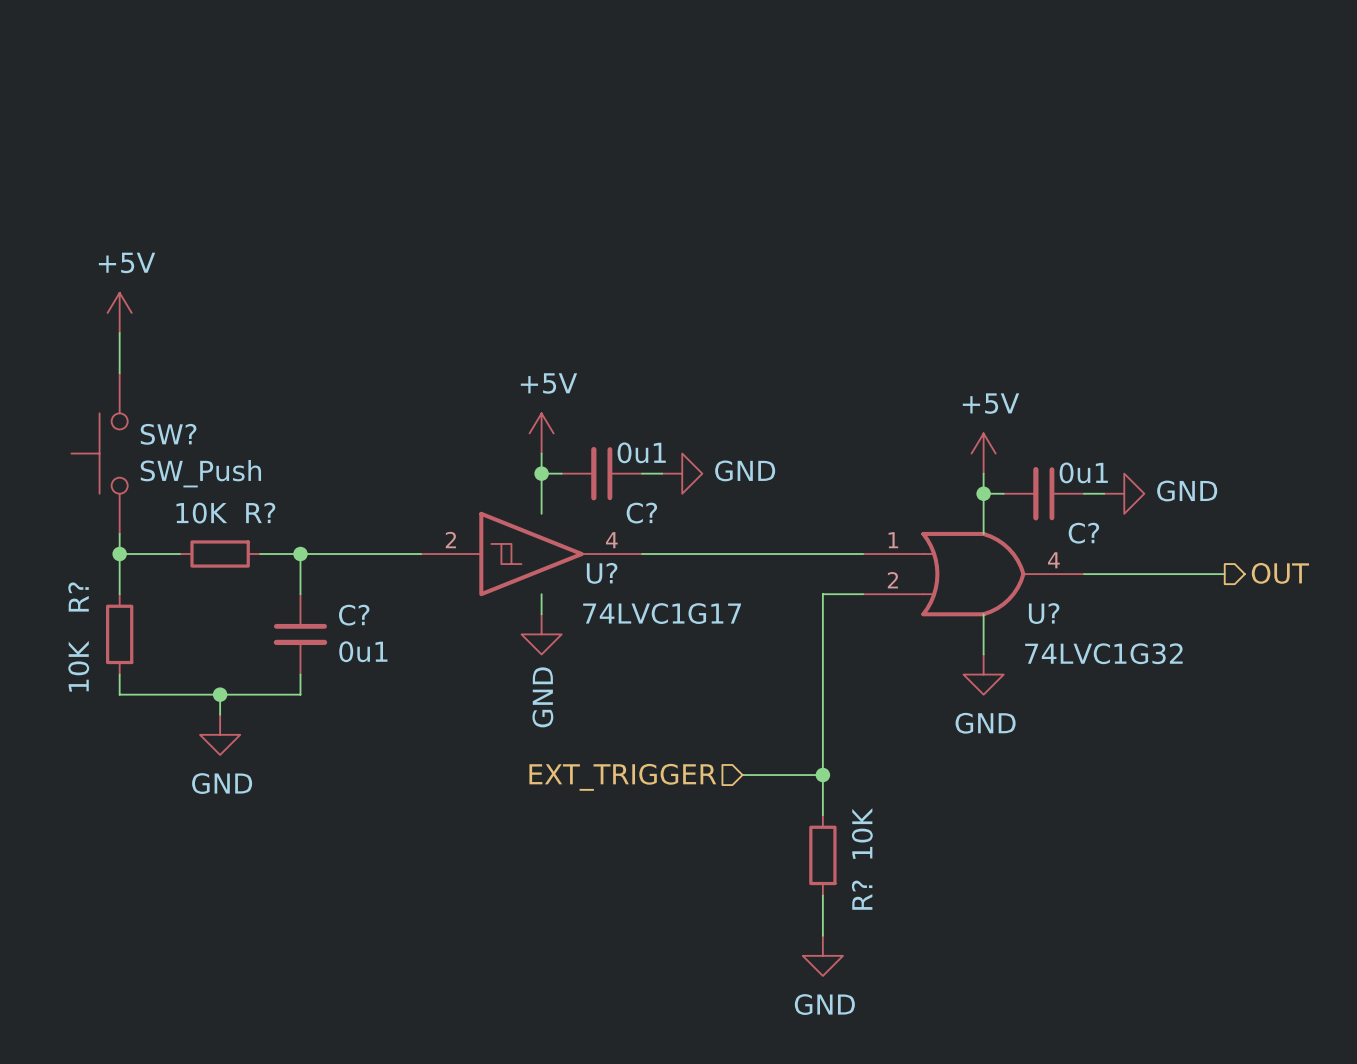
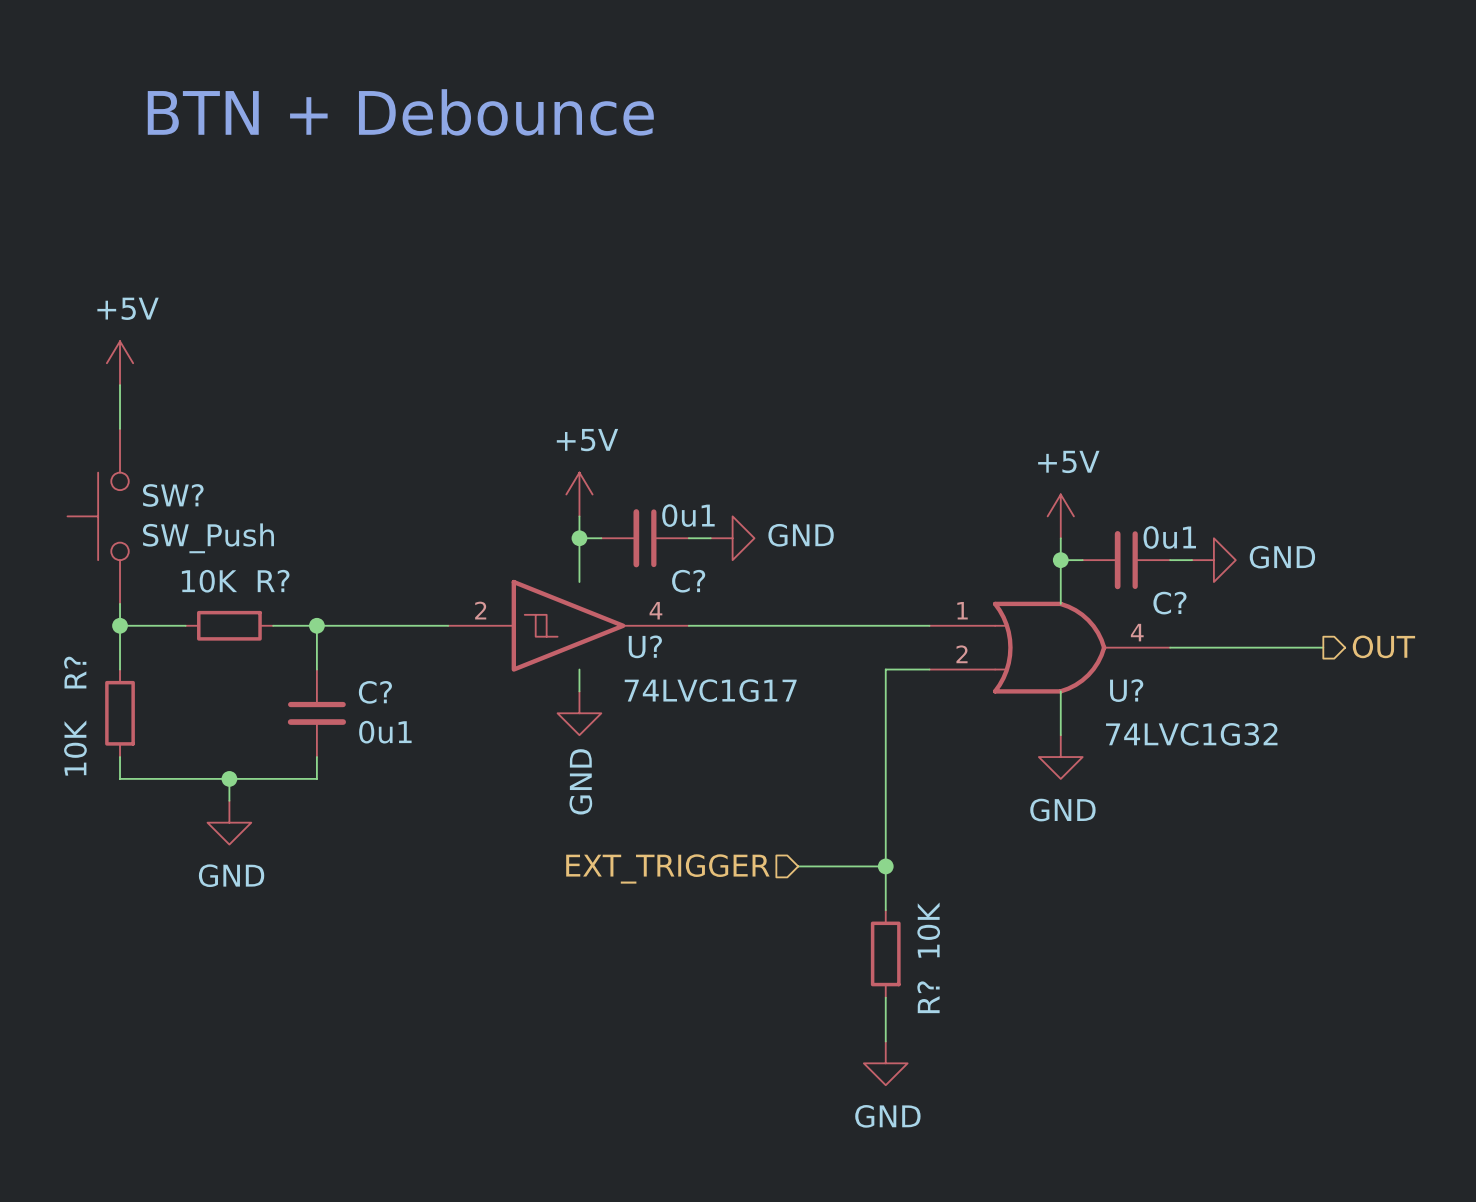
text: none -> BTN + Debounce (400, 112)

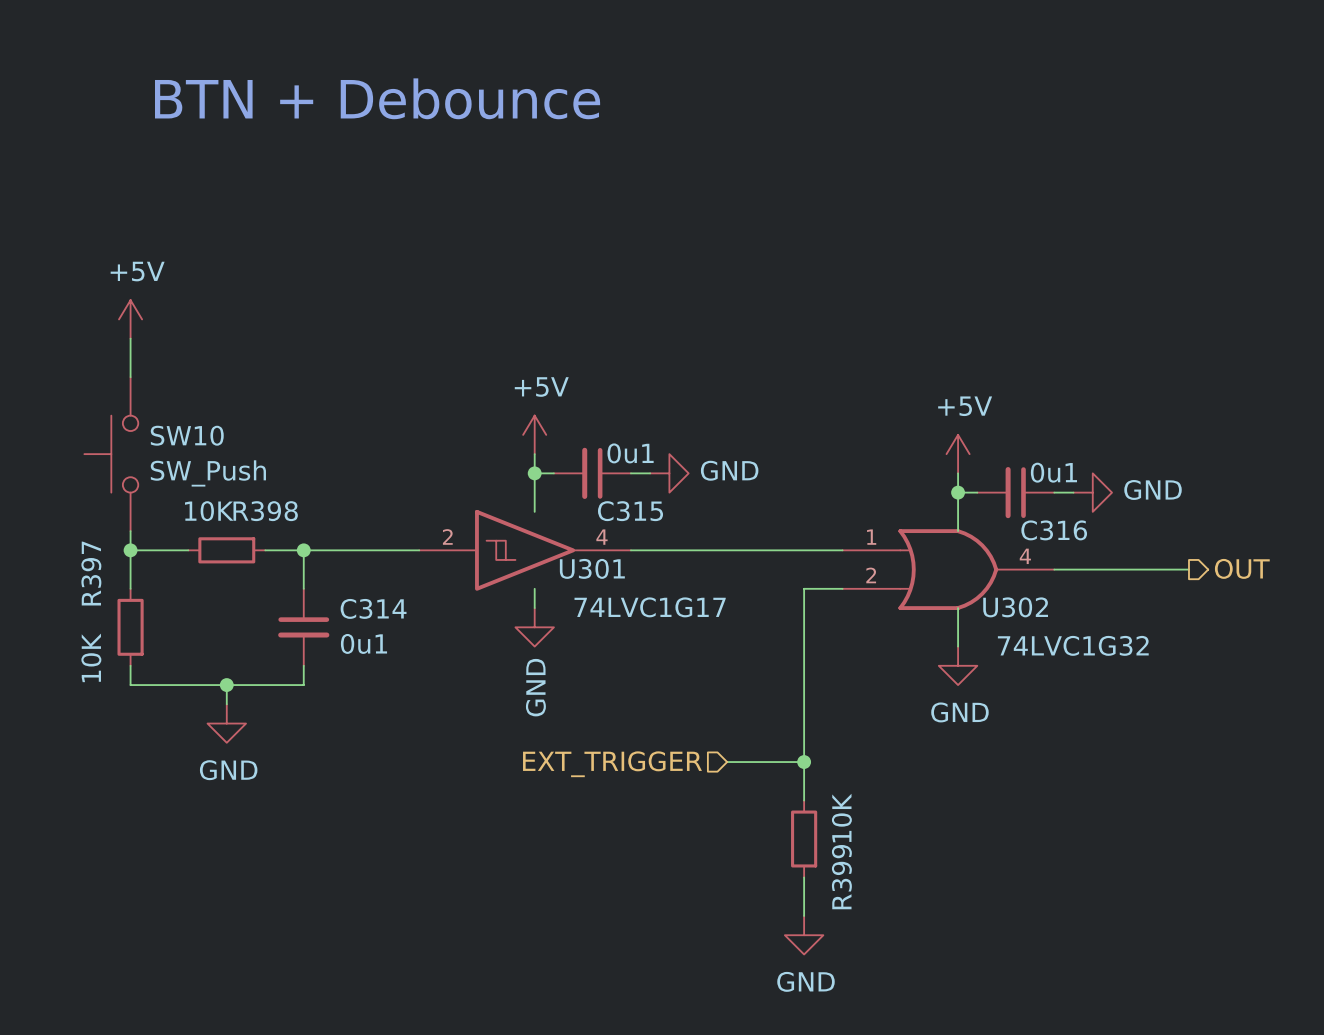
SW? name: SW? (173, 495) -> SW10 (187, 435)
R? name: R? (273, 581) -> R398 (265, 511)
C? name: C? (688, 581) -> C315 (630, 511)
C? name: C? (1169, 603) -> C316 (1054, 530)
U? name: U? (645, 646) -> U301 (592, 568)
R? name: R? (75, 672) -> R397 (91, 573)
U? name: U? (1126, 690) -> U302 (1015, 607)
C? name: C? (375, 692) -> C314 (373, 608)
R? name: R? (928, 997) -> R399 (841, 877)

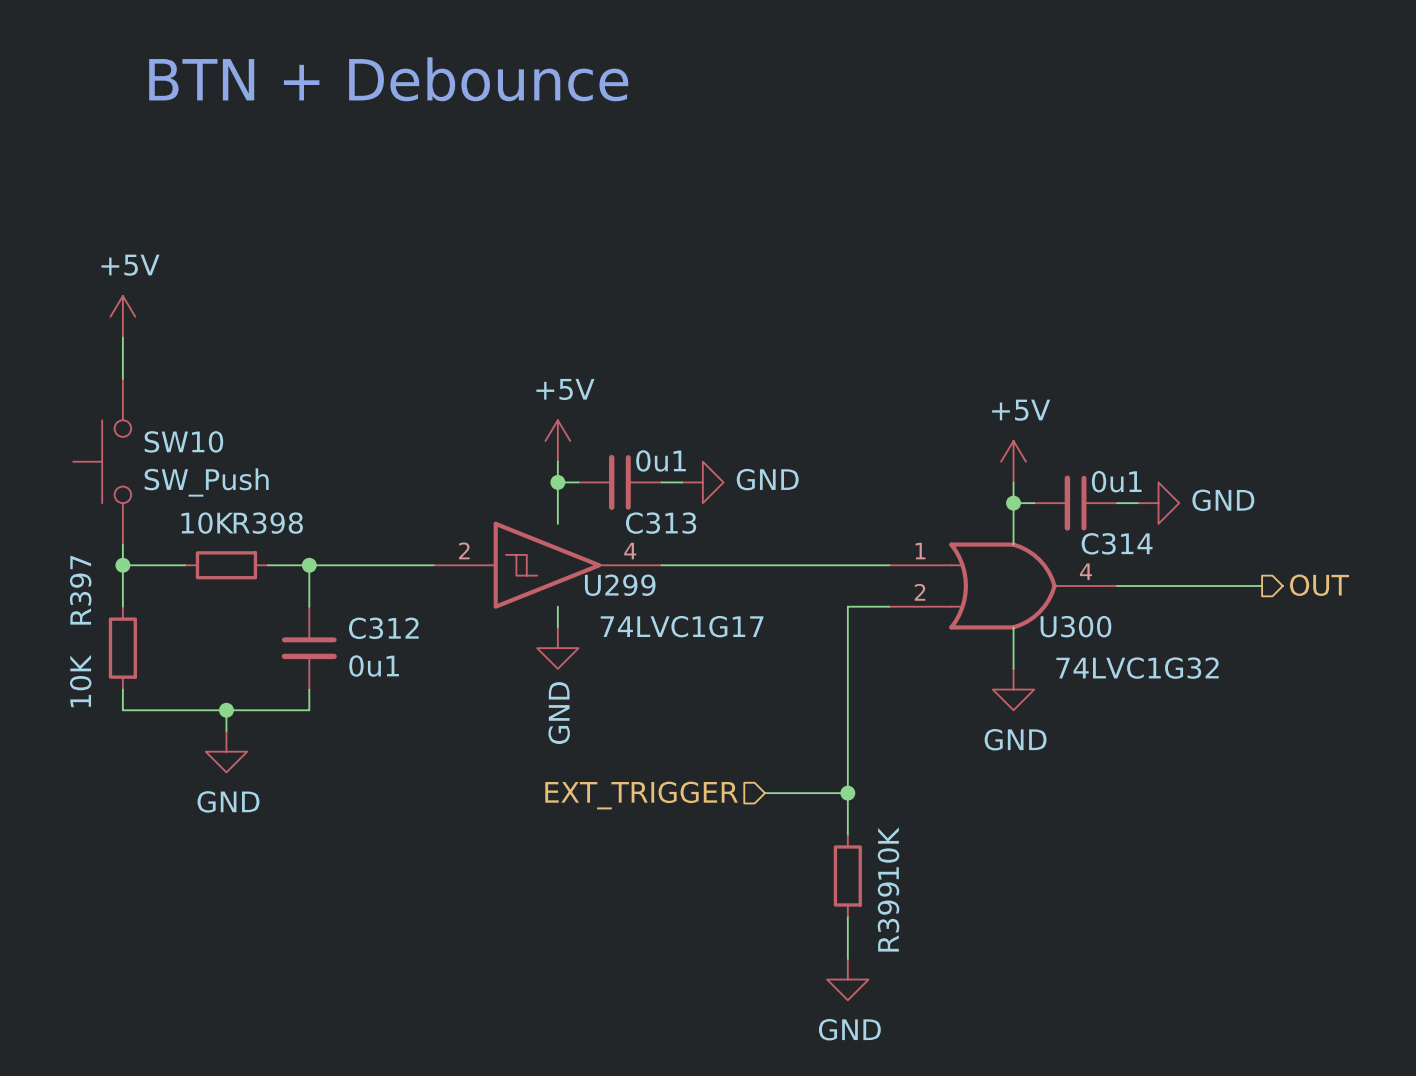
C315 name: C315 (630, 511) -> C313 (661, 523)
C316 name: C316 (1054, 530) -> C314 (1117, 543)
U301 name: U301 (592, 568) -> U299 (620, 585)
U302 name: U302 (1015, 607) -> U300 (1075, 626)
C314 name: C314 (373, 608) -> C312 (383, 628)

